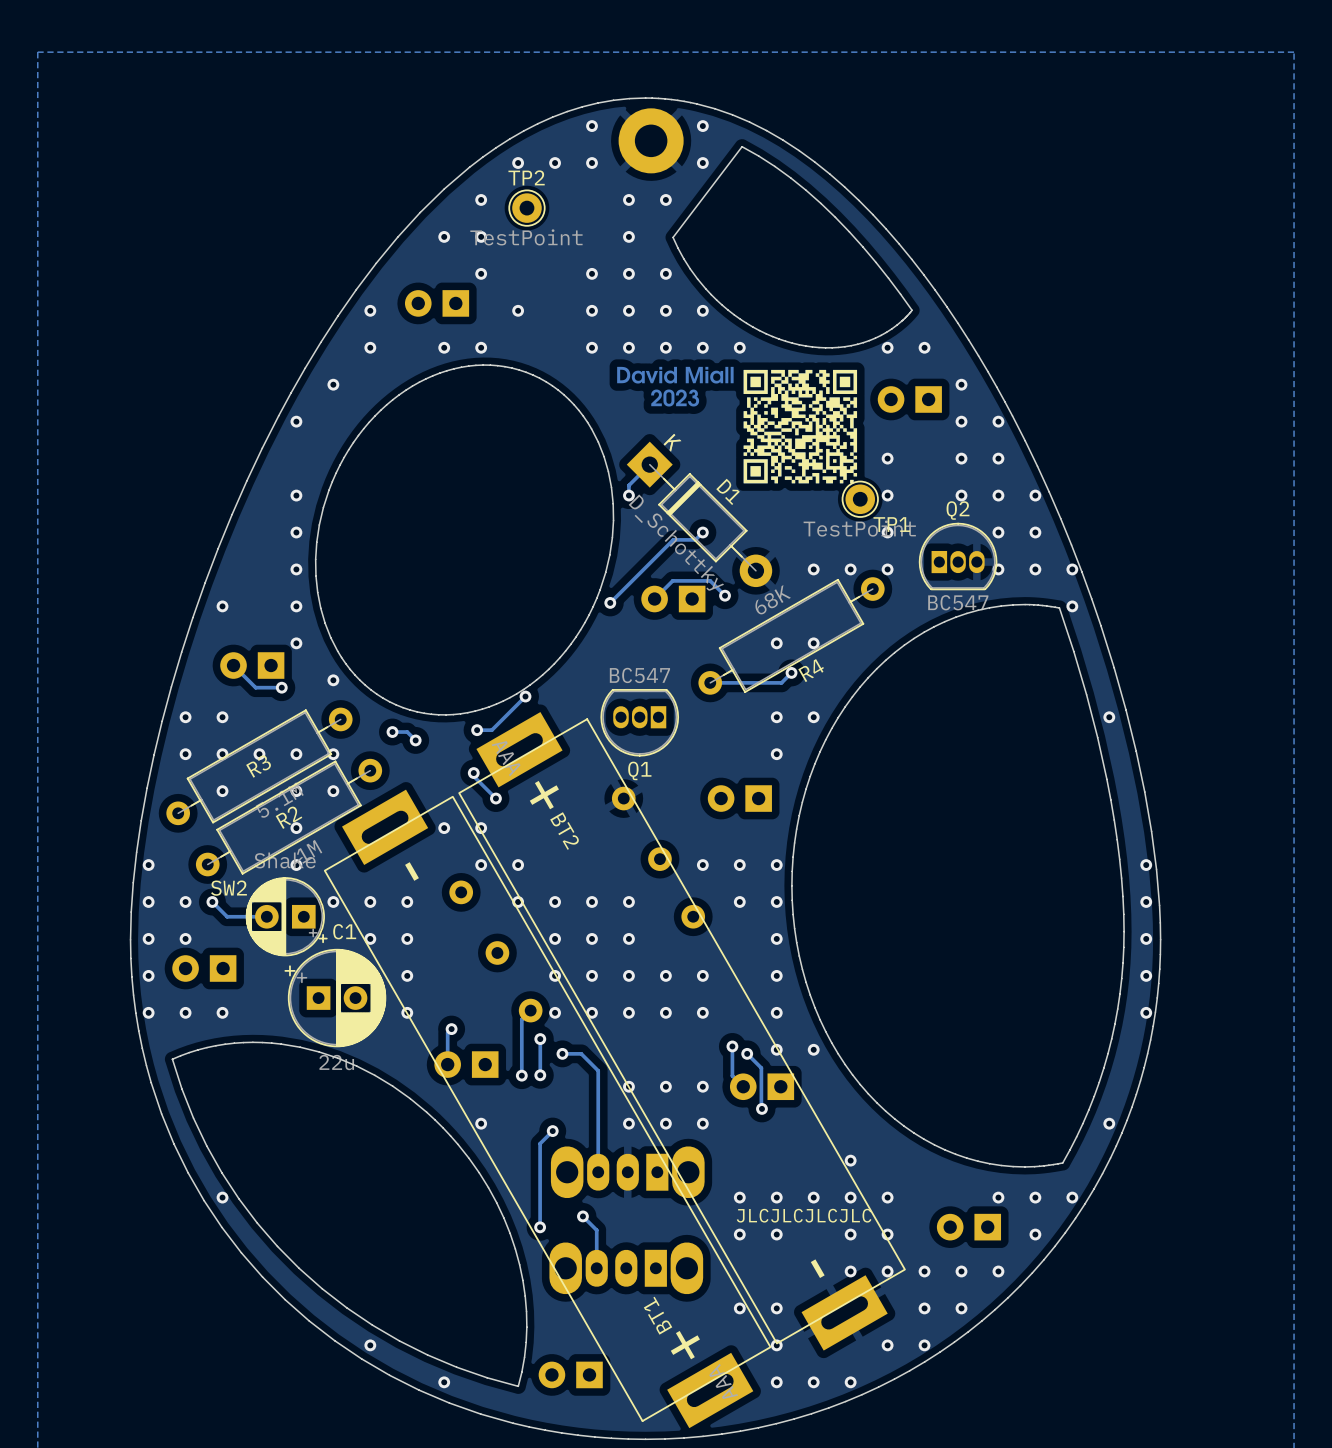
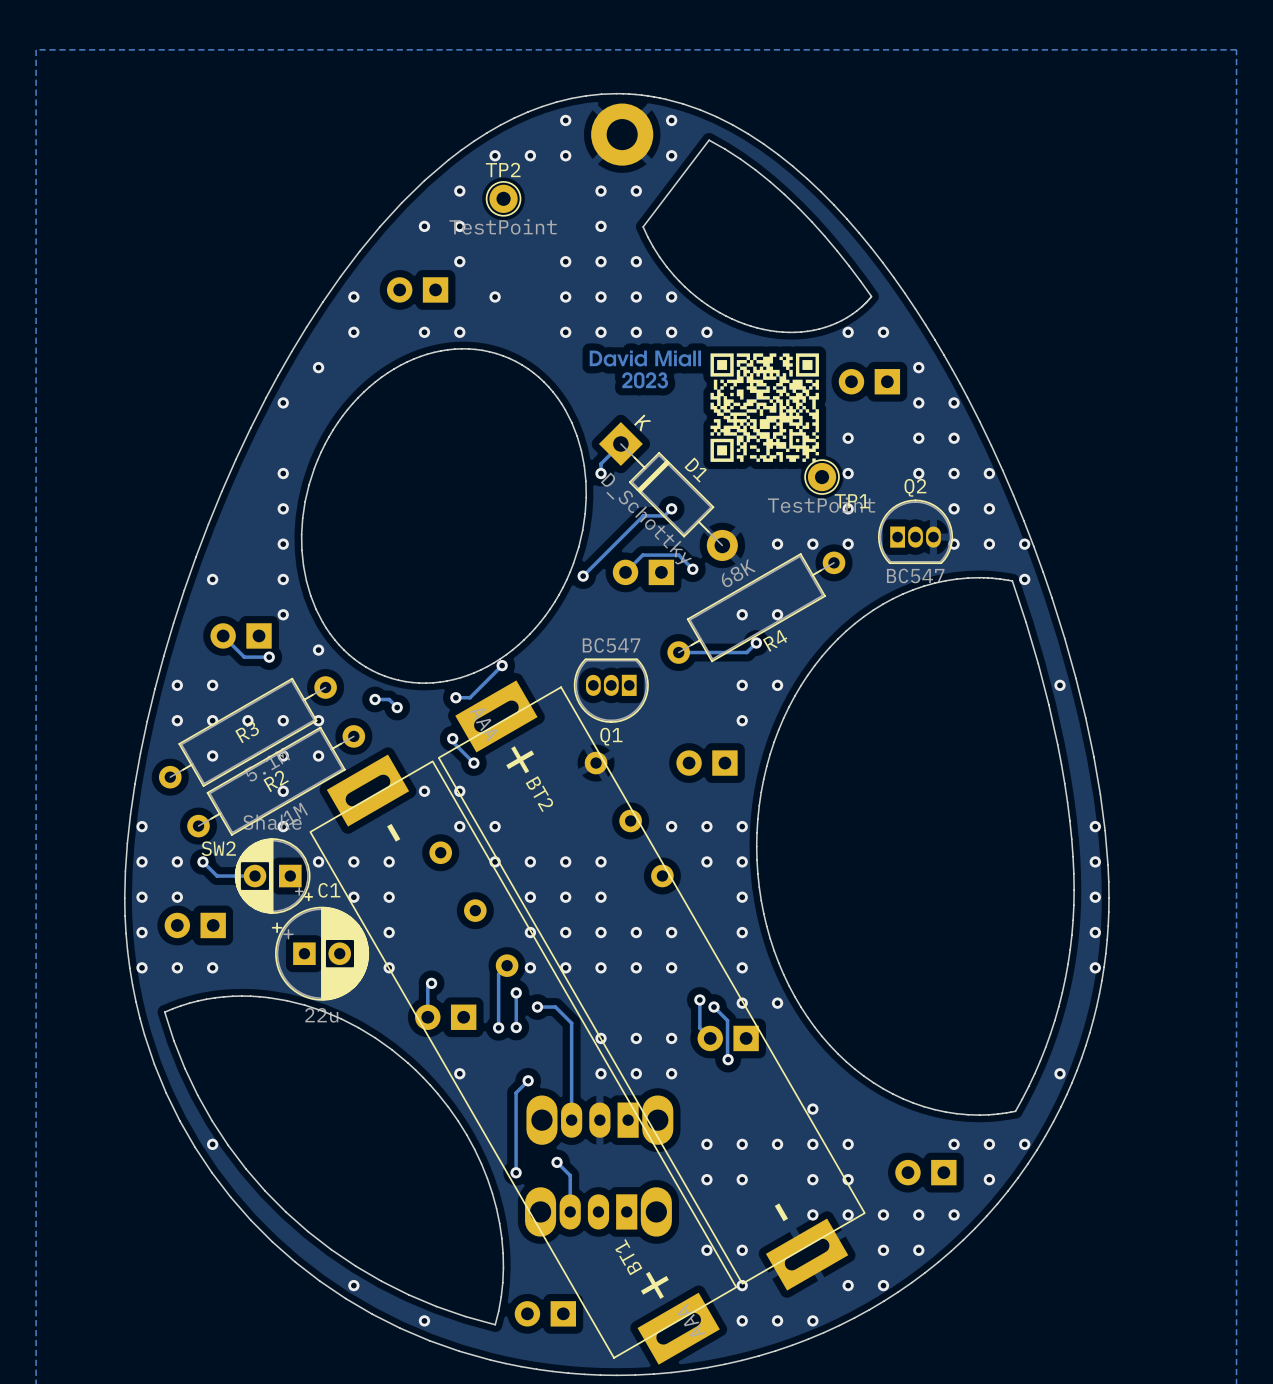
text: JLCJLCJLCJLC (804, 1215) -> none

